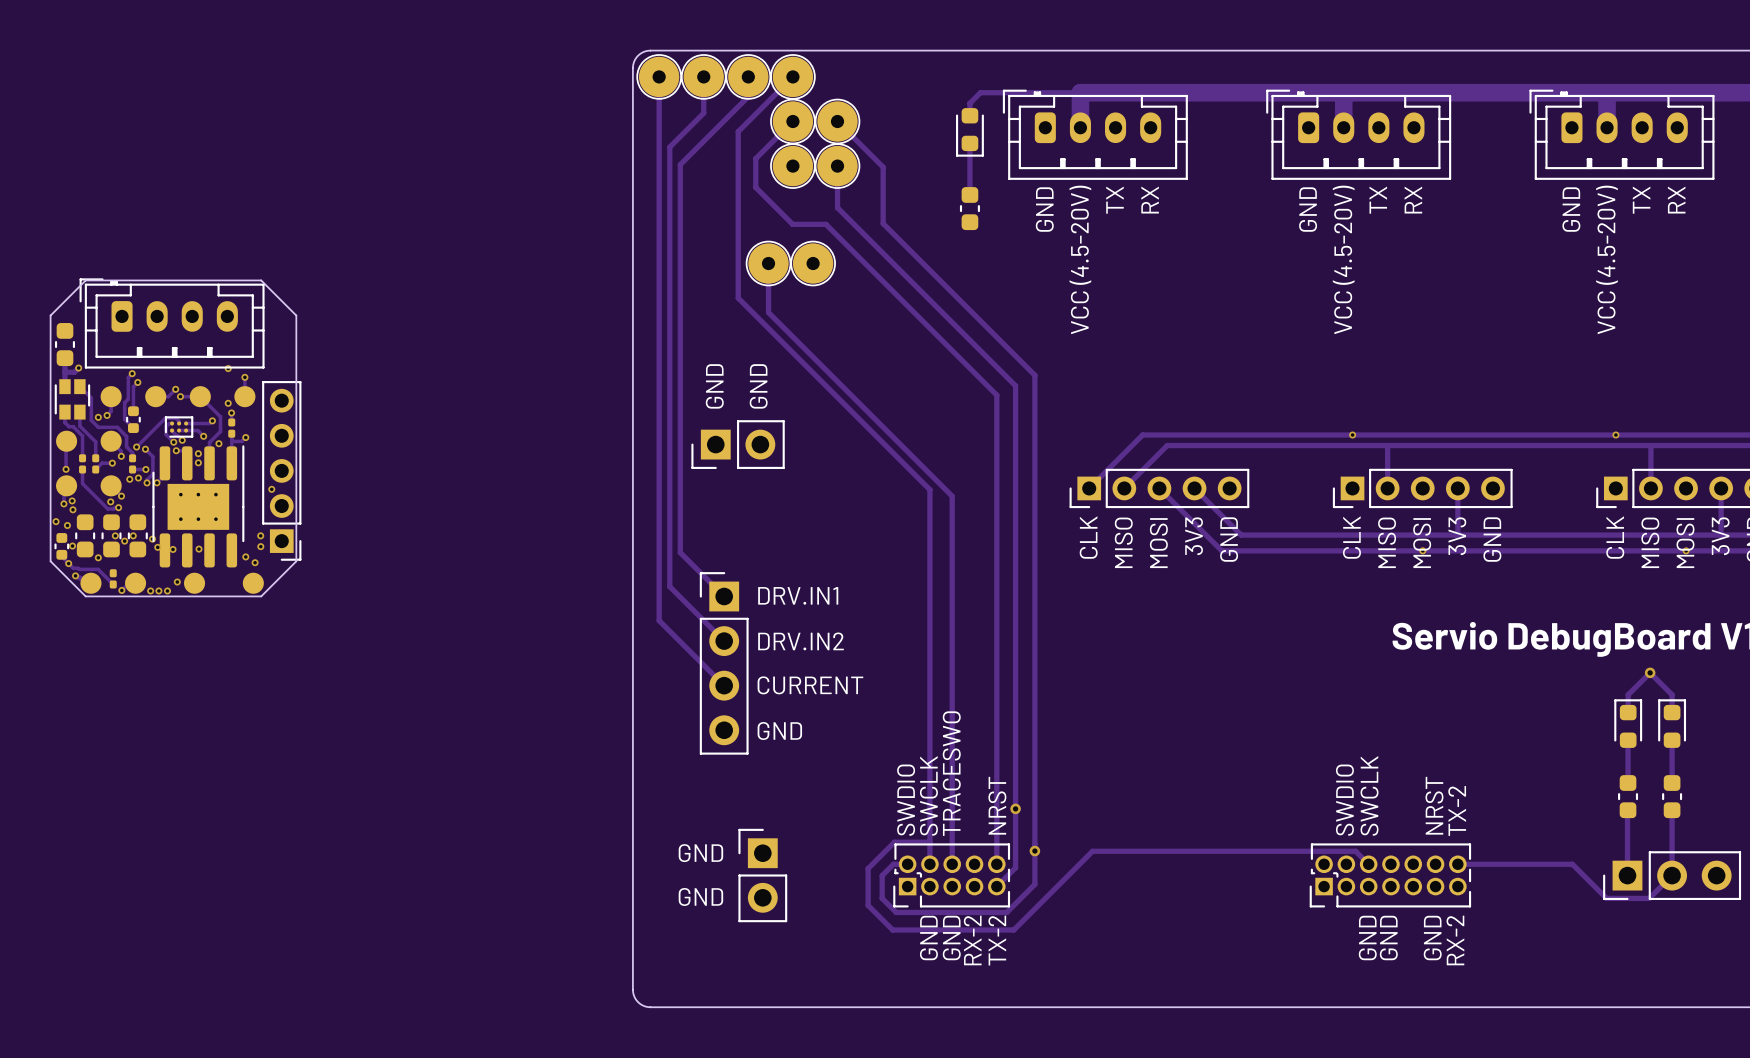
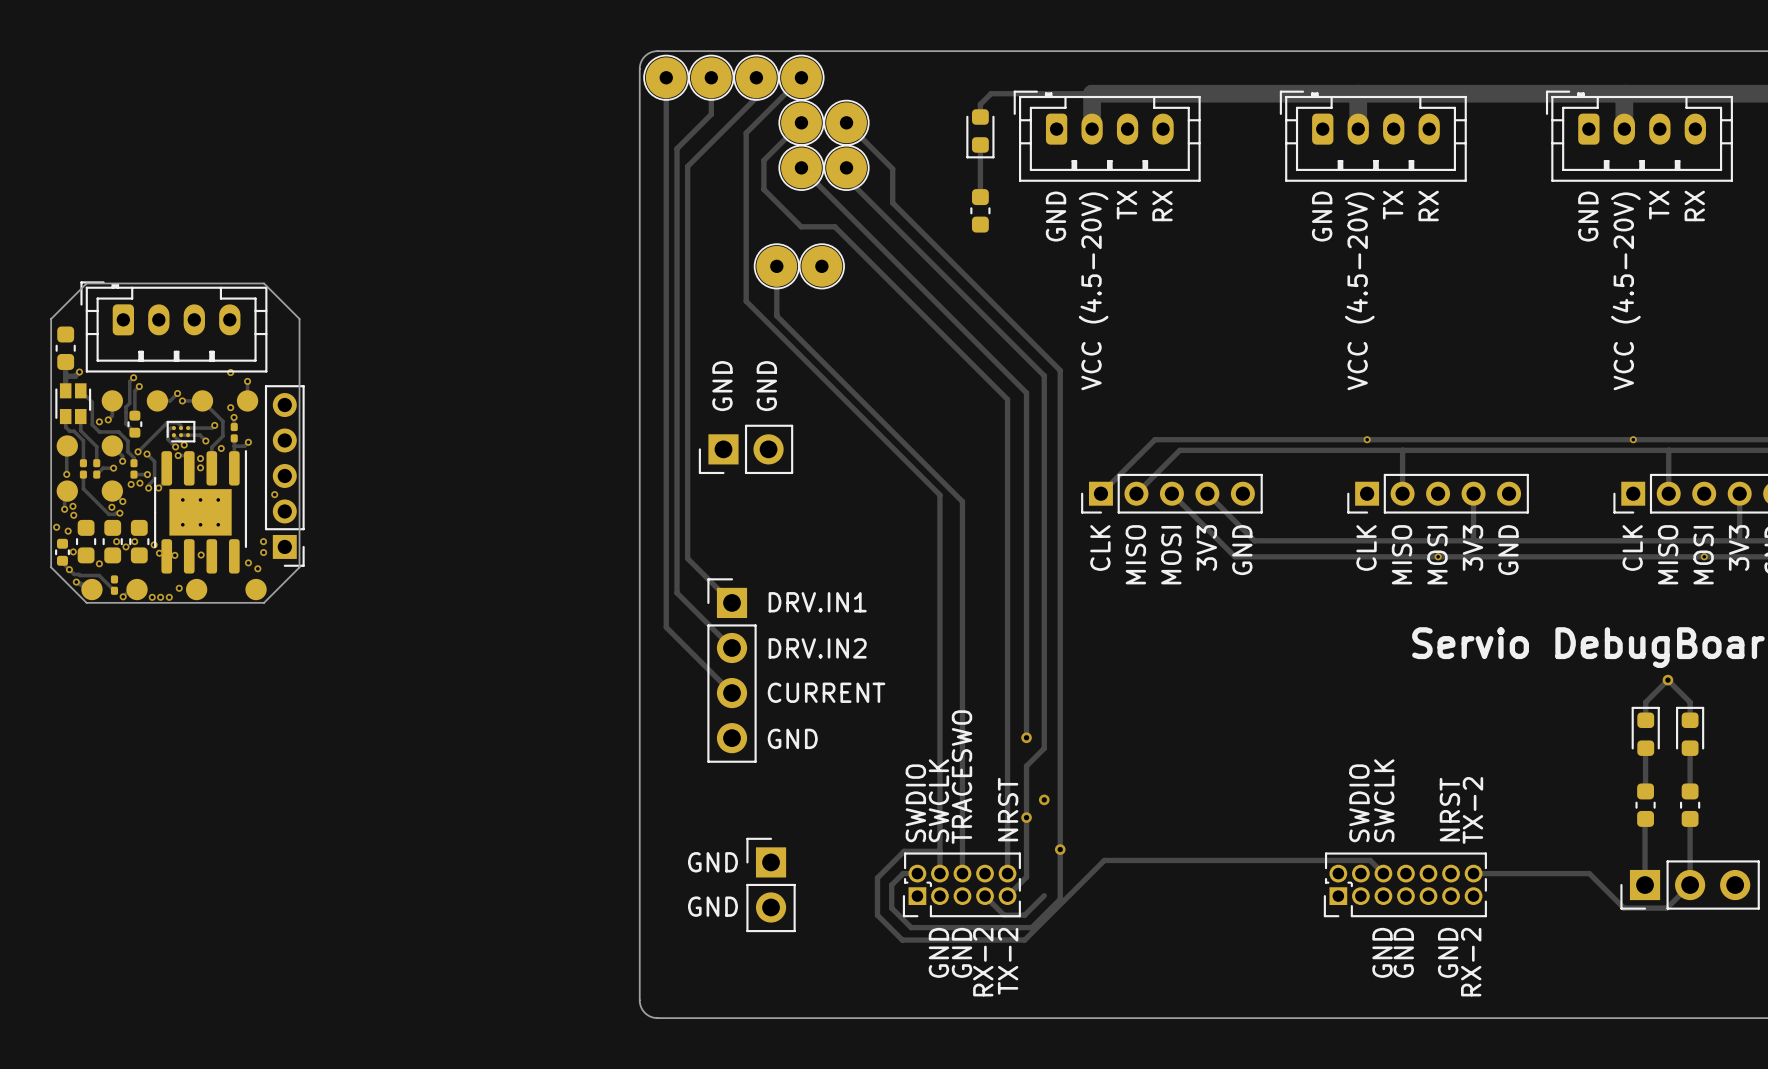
track: (837, 176) (837, 207) (1015, 385) (1015, 388) -> (801, 167) (1026, 392)
track: (883, 200) (883, 223) (1034, 375) (1034, 884) (1033, 886) -> (892, 202) (1060, 370) (1060, 899) (1031, 927) (911, 927) (905, 922)
track: (1015, 729) (1015, 757) -> (846, 178) (1044, 375) (1044, 748) (1026, 766)
via: none -> (1026, 737)
via: none -> (1044, 799)
via position: (1034, 851) -> (1060, 849)
track: (1013, 905) (1006, 912) (896, 912) -> (1024, 915) (1004, 915) (985, 896)

